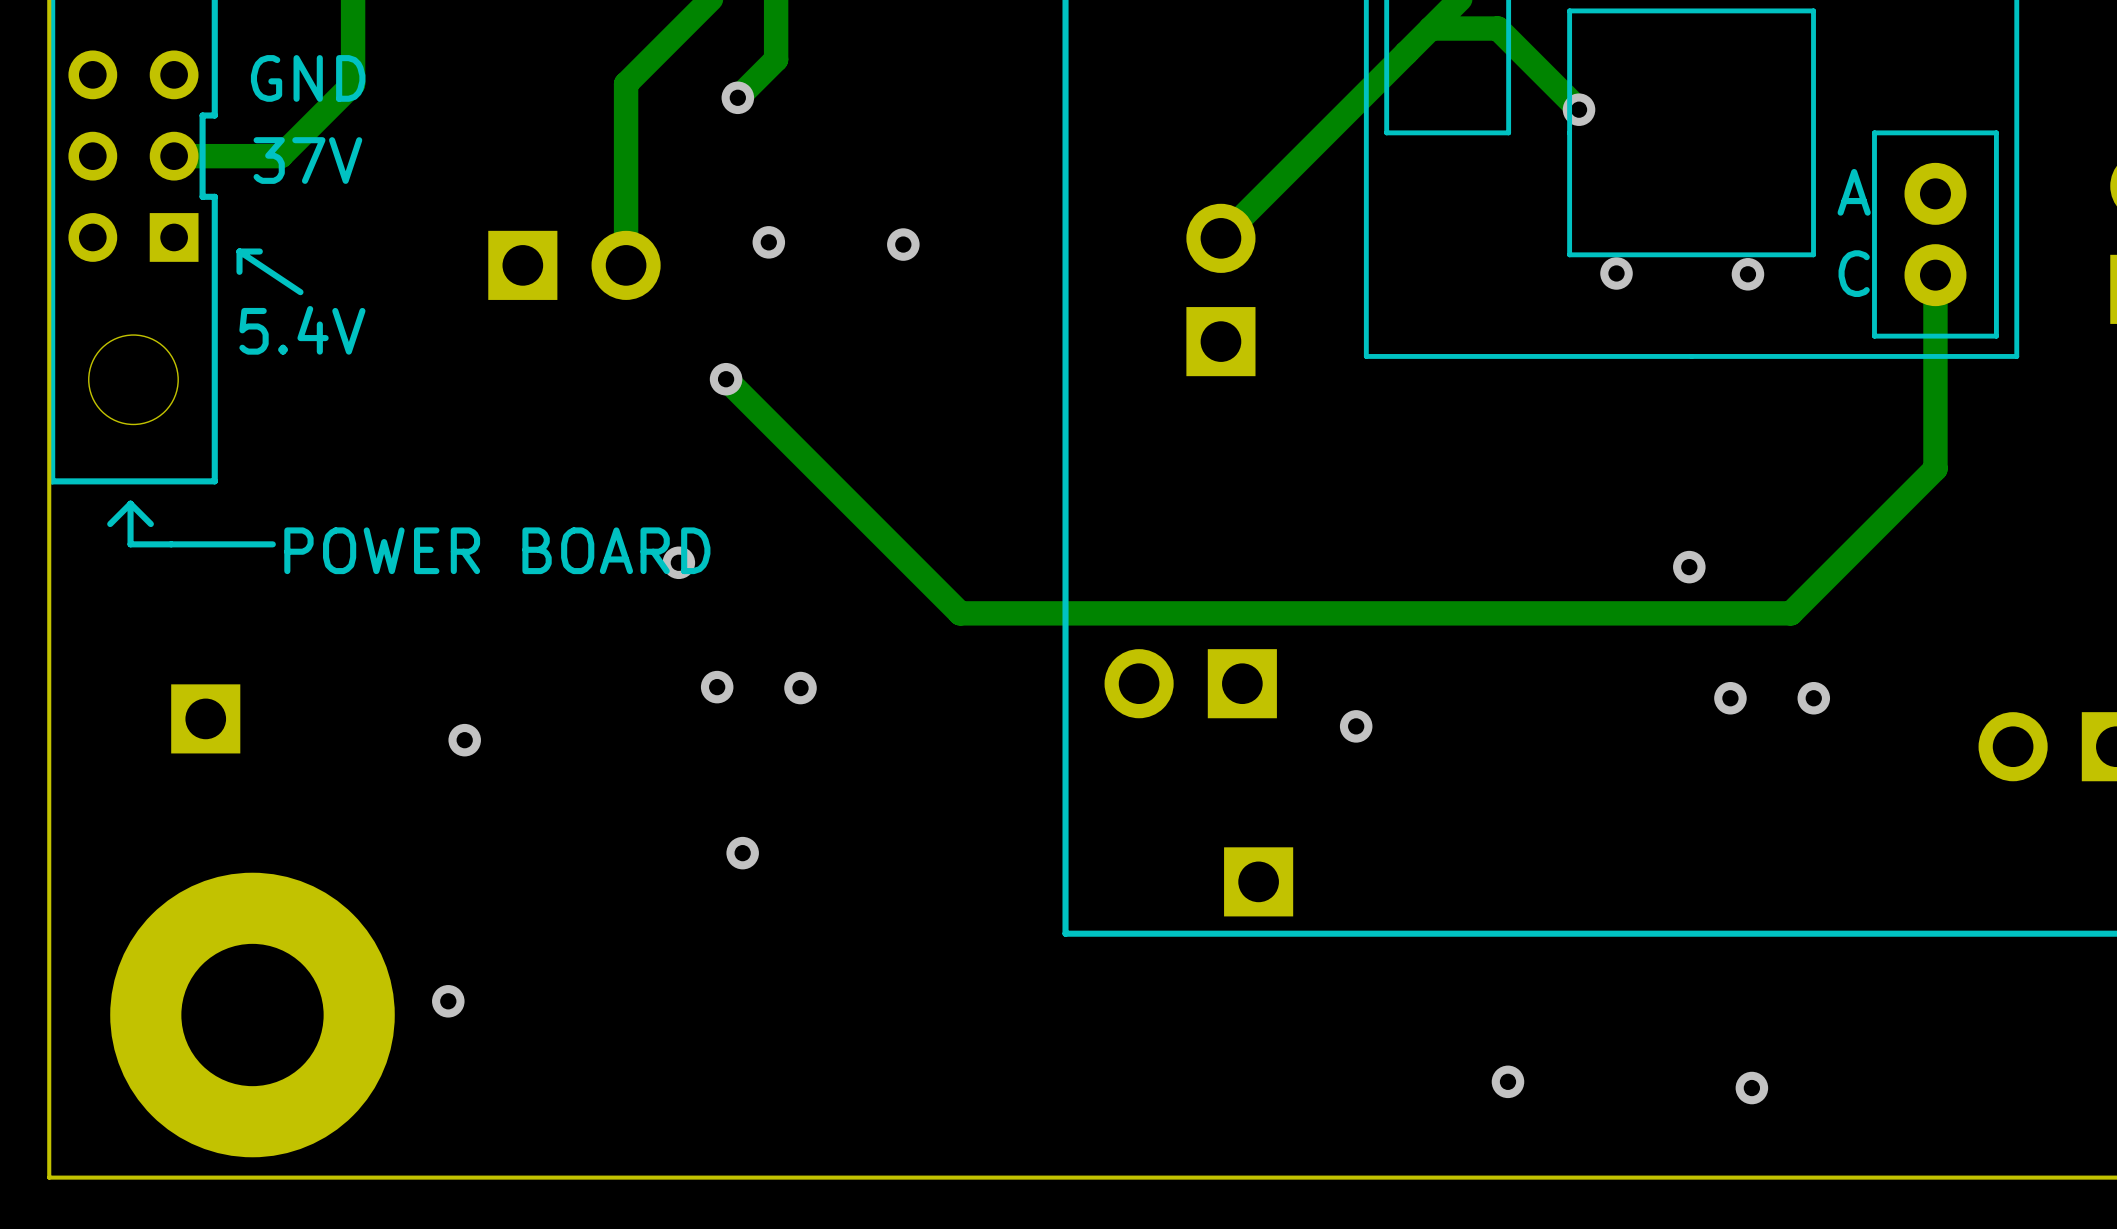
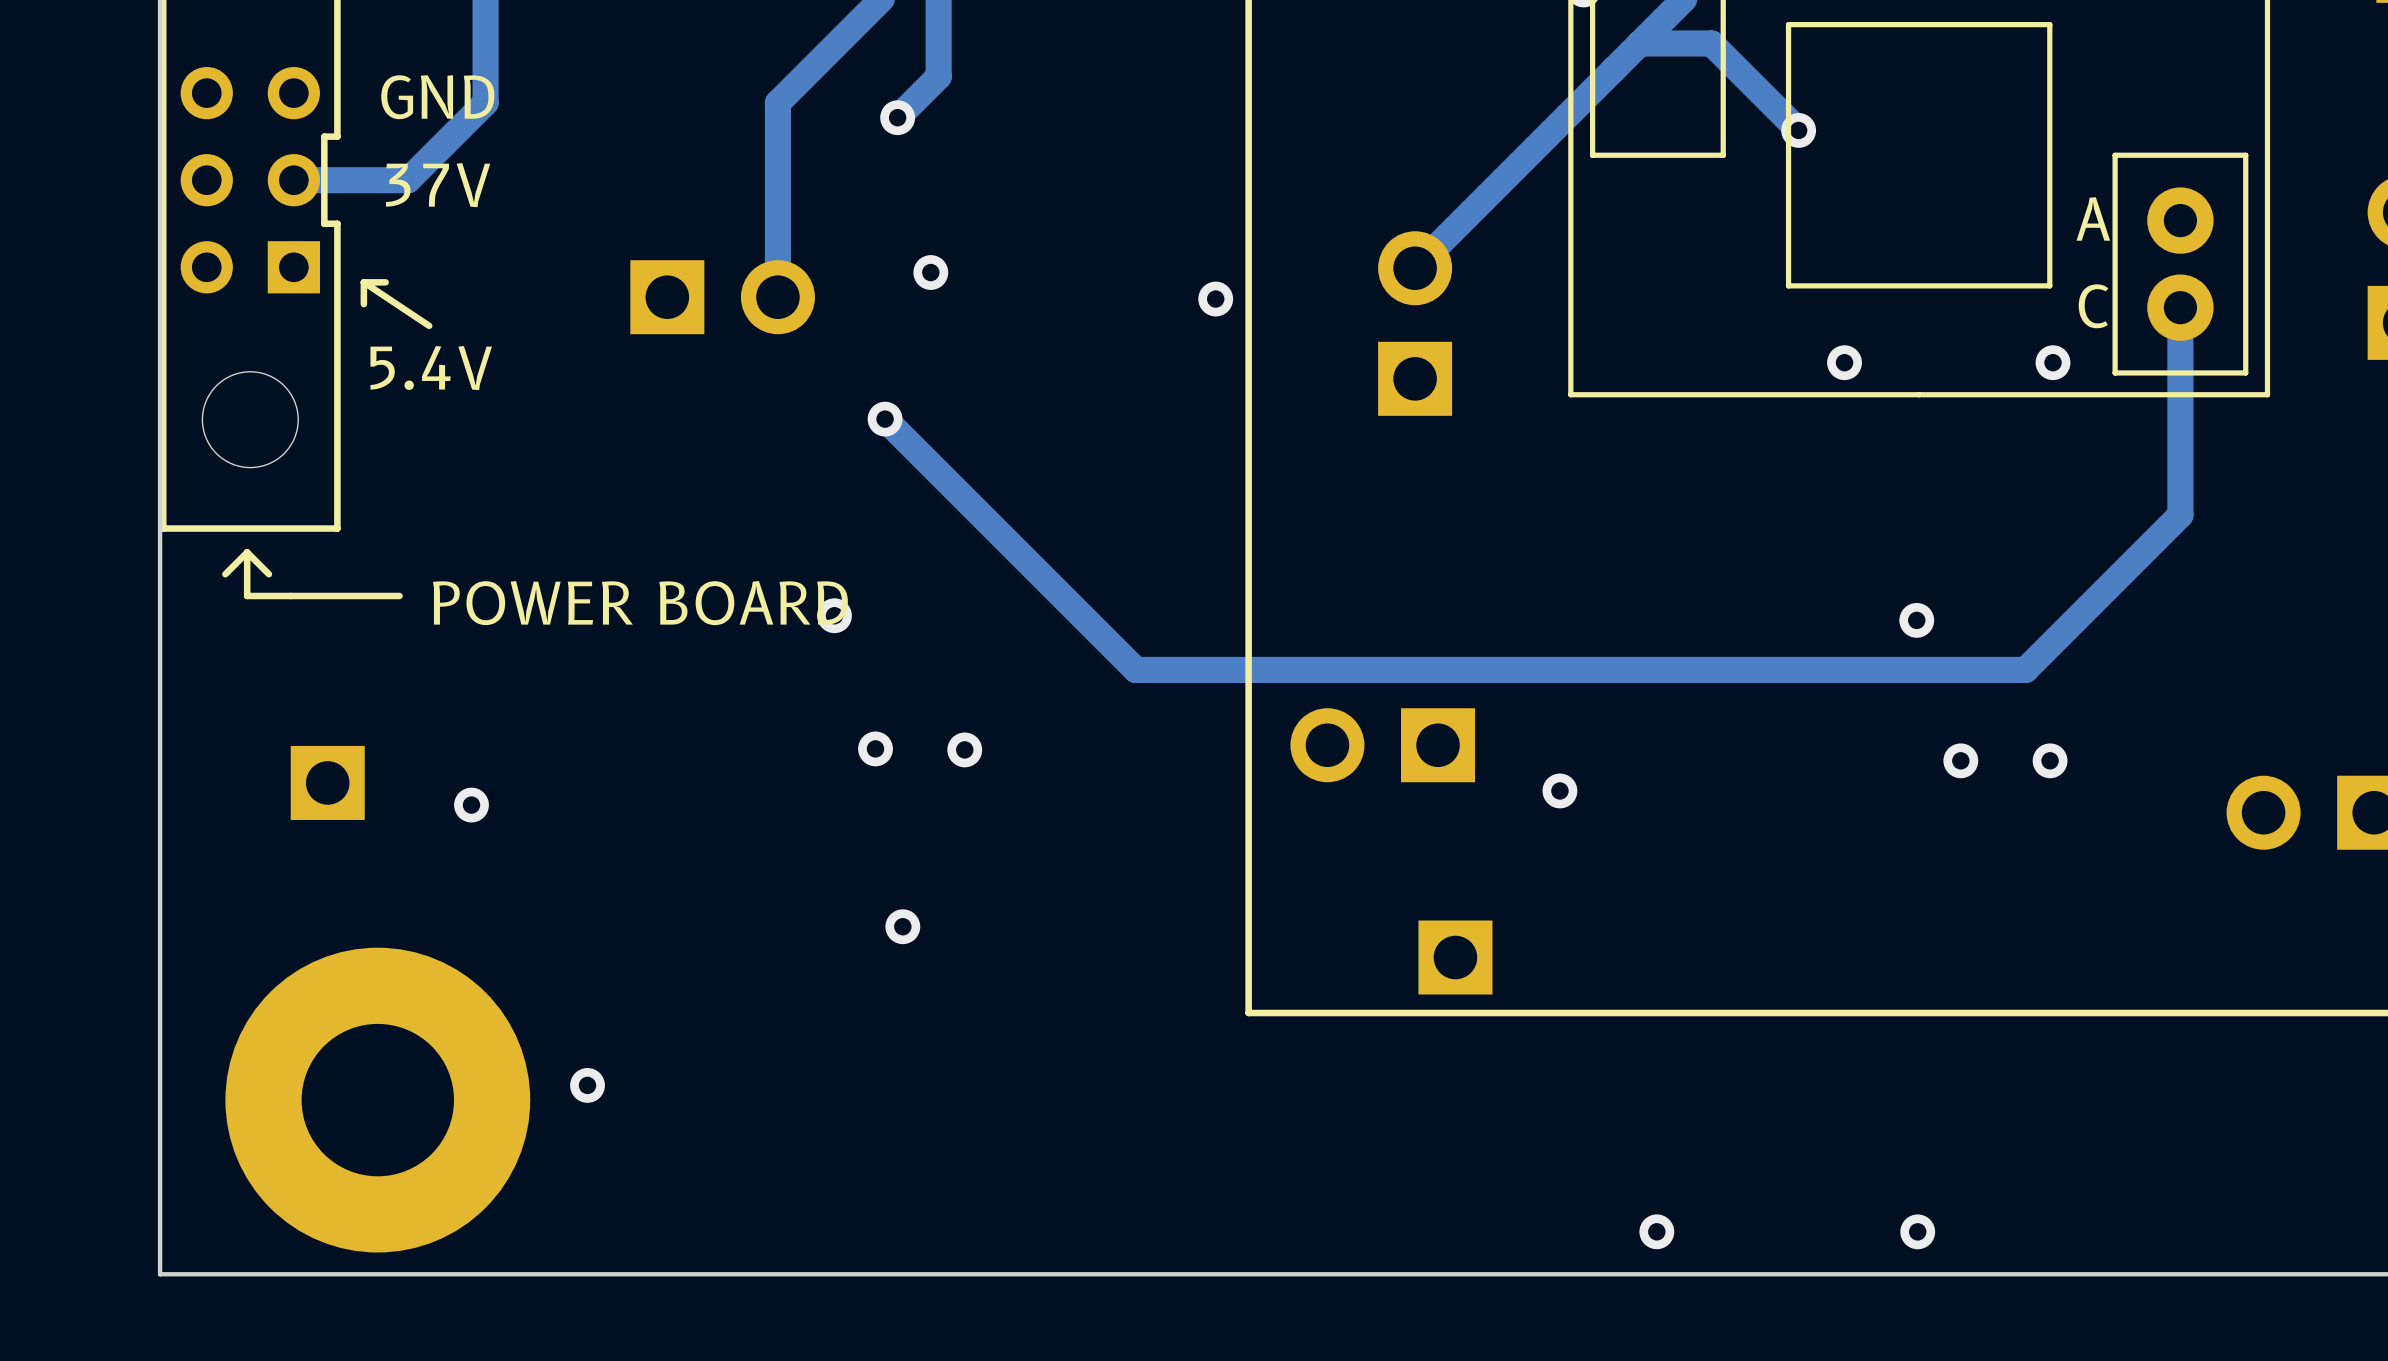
via position: (903, 244) -> (1215, 299)
via position: (1616, 273) -> (1844, 362)
via: (1747, 274) -> none
via: none -> (2053, 362)
via position: (464, 740) -> (471, 805)
via position: (1507, 1081) -> (1656, 1231)
via position: (1751, 1088) -> (1917, 1231)

